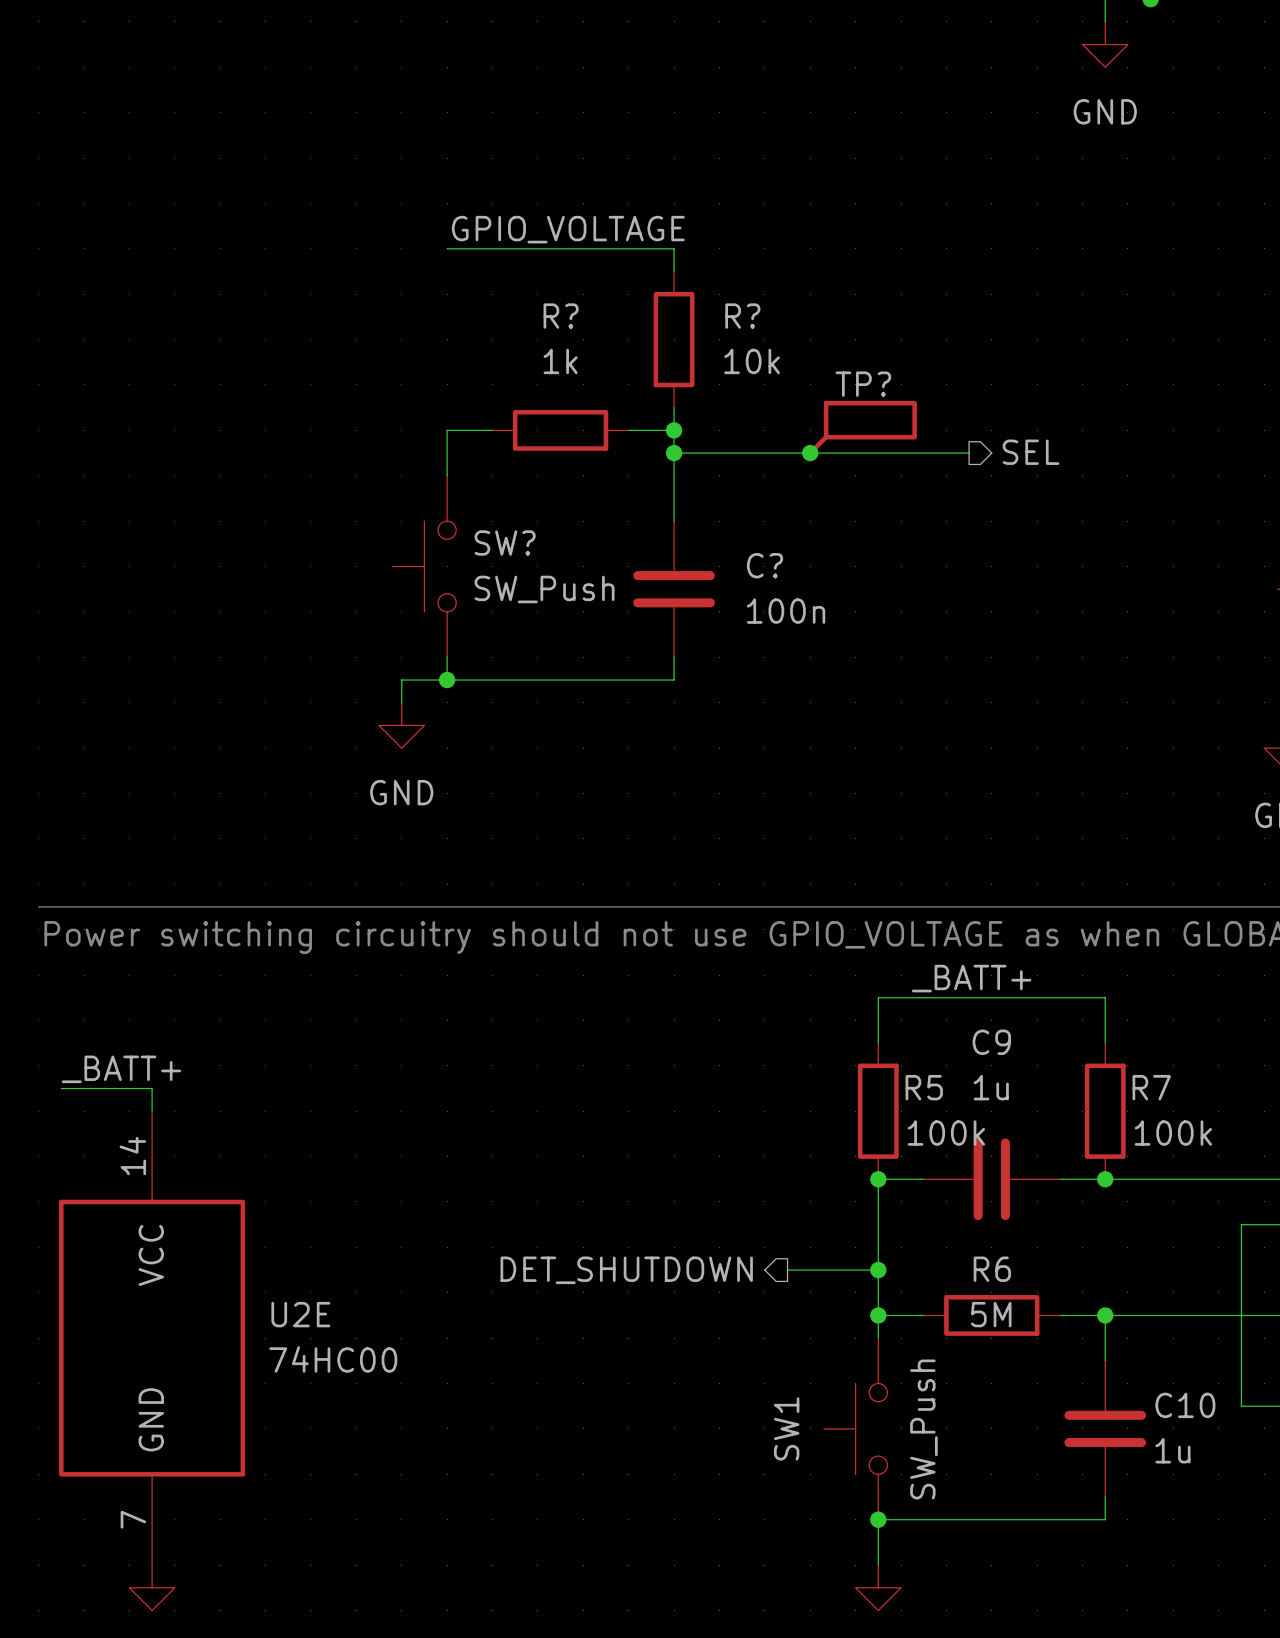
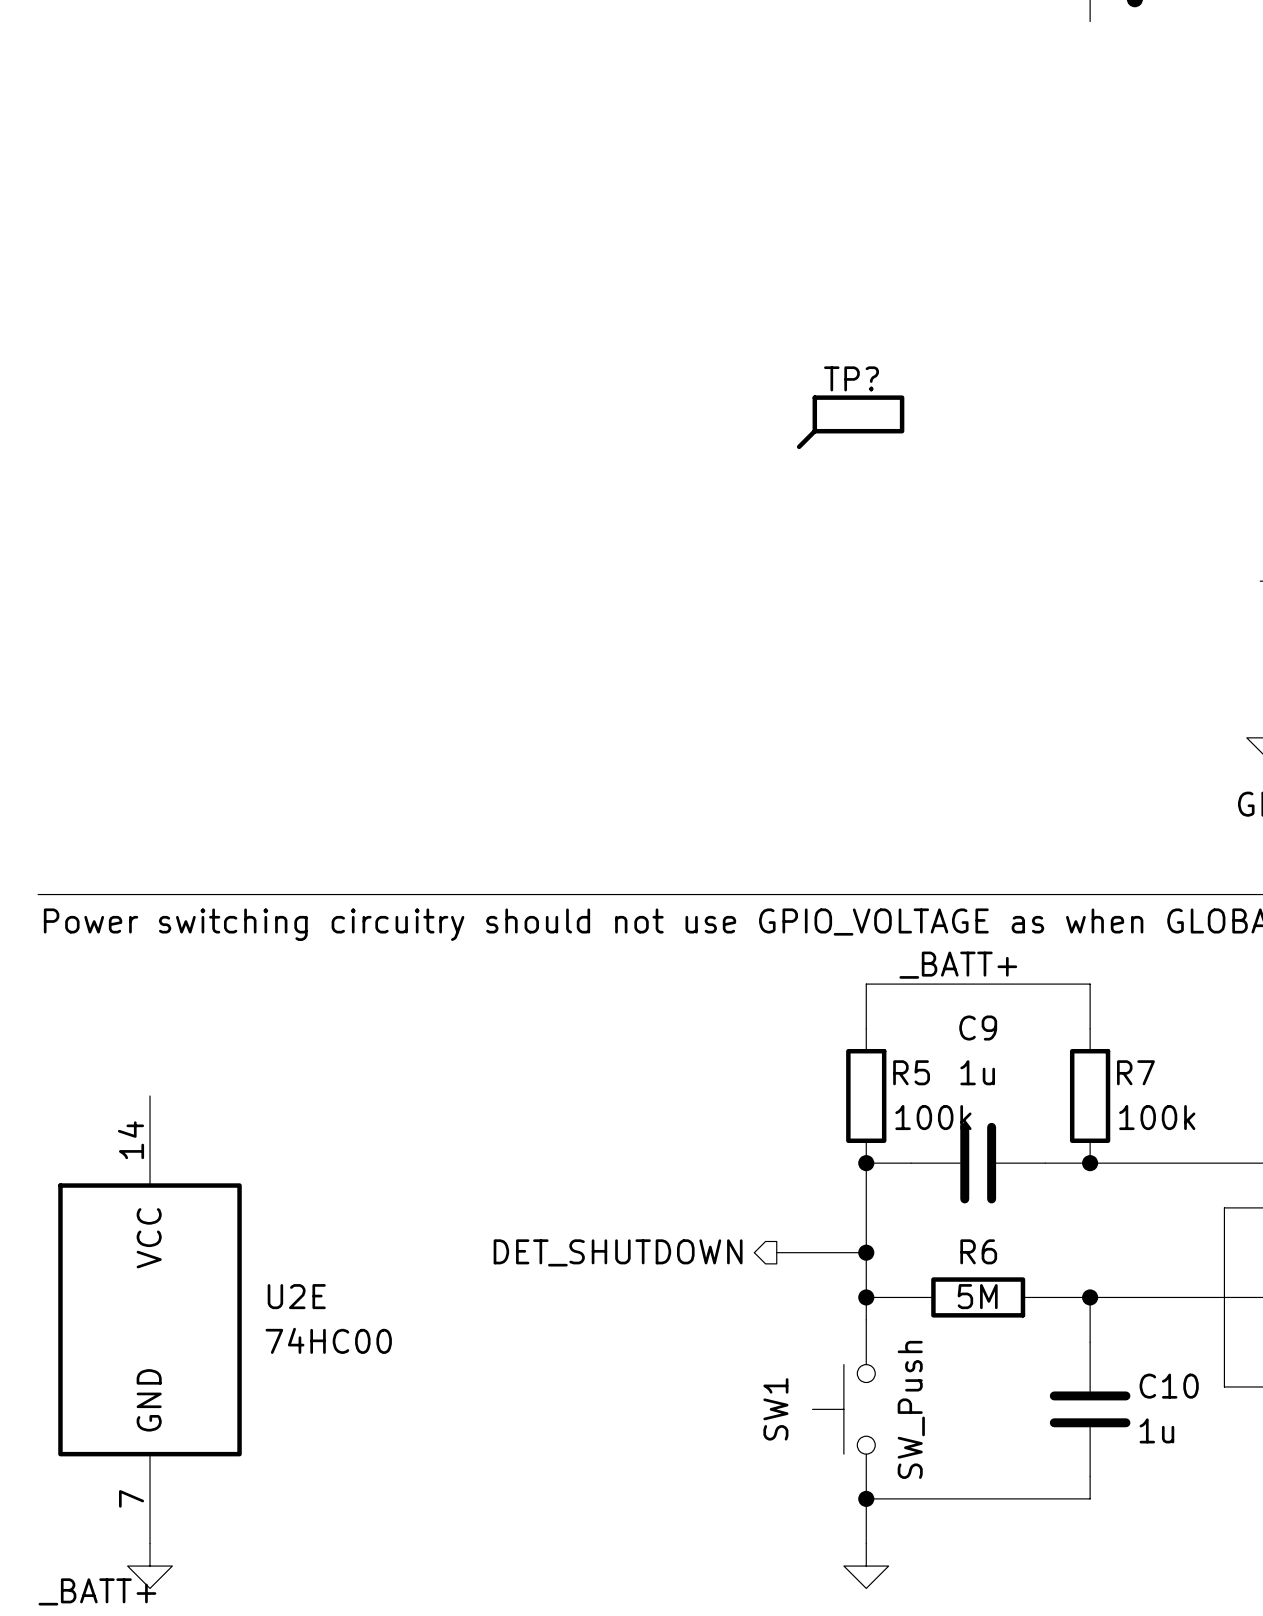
power symbol: GND (1105, 44) -> none
label: GPIO_VOLTAGE (568, 229) -> none
wire: (447, 248) (674, 248) (674, 271) -> none
R?: 10k (674, 339) -> none
wire: (674, 407) (674, 521) -> none
wire: (492, 430) (447, 430) (447, 475) -> none
R?: 1k (560, 430) -> none
wire: (628, 430) (674, 430) -> none
junction: (674, 430) -> none
hierarchical label: SEL (1031, 452) -> none
wire: (674, 453) (969, 453) -> none
junction: (674, 453) -> none
junction: (810, 453) -> none
SW?: SW_Push (424, 566) -> none
C?: 100n (674, 589) -> none
wire: (447, 657) (447, 680) -> none
wire: (674, 657) (674, 680) (401, 680) (401, 702) -> none
junction: (447, 680) -> none
power symbol: GND (401, 725) -> none
label: _BATT+ (121, 1069) -> none
wire: (61, 1088) (152, 1088) (152, 1111) -> none
label: none -> _BATT+ (97, 1591)

